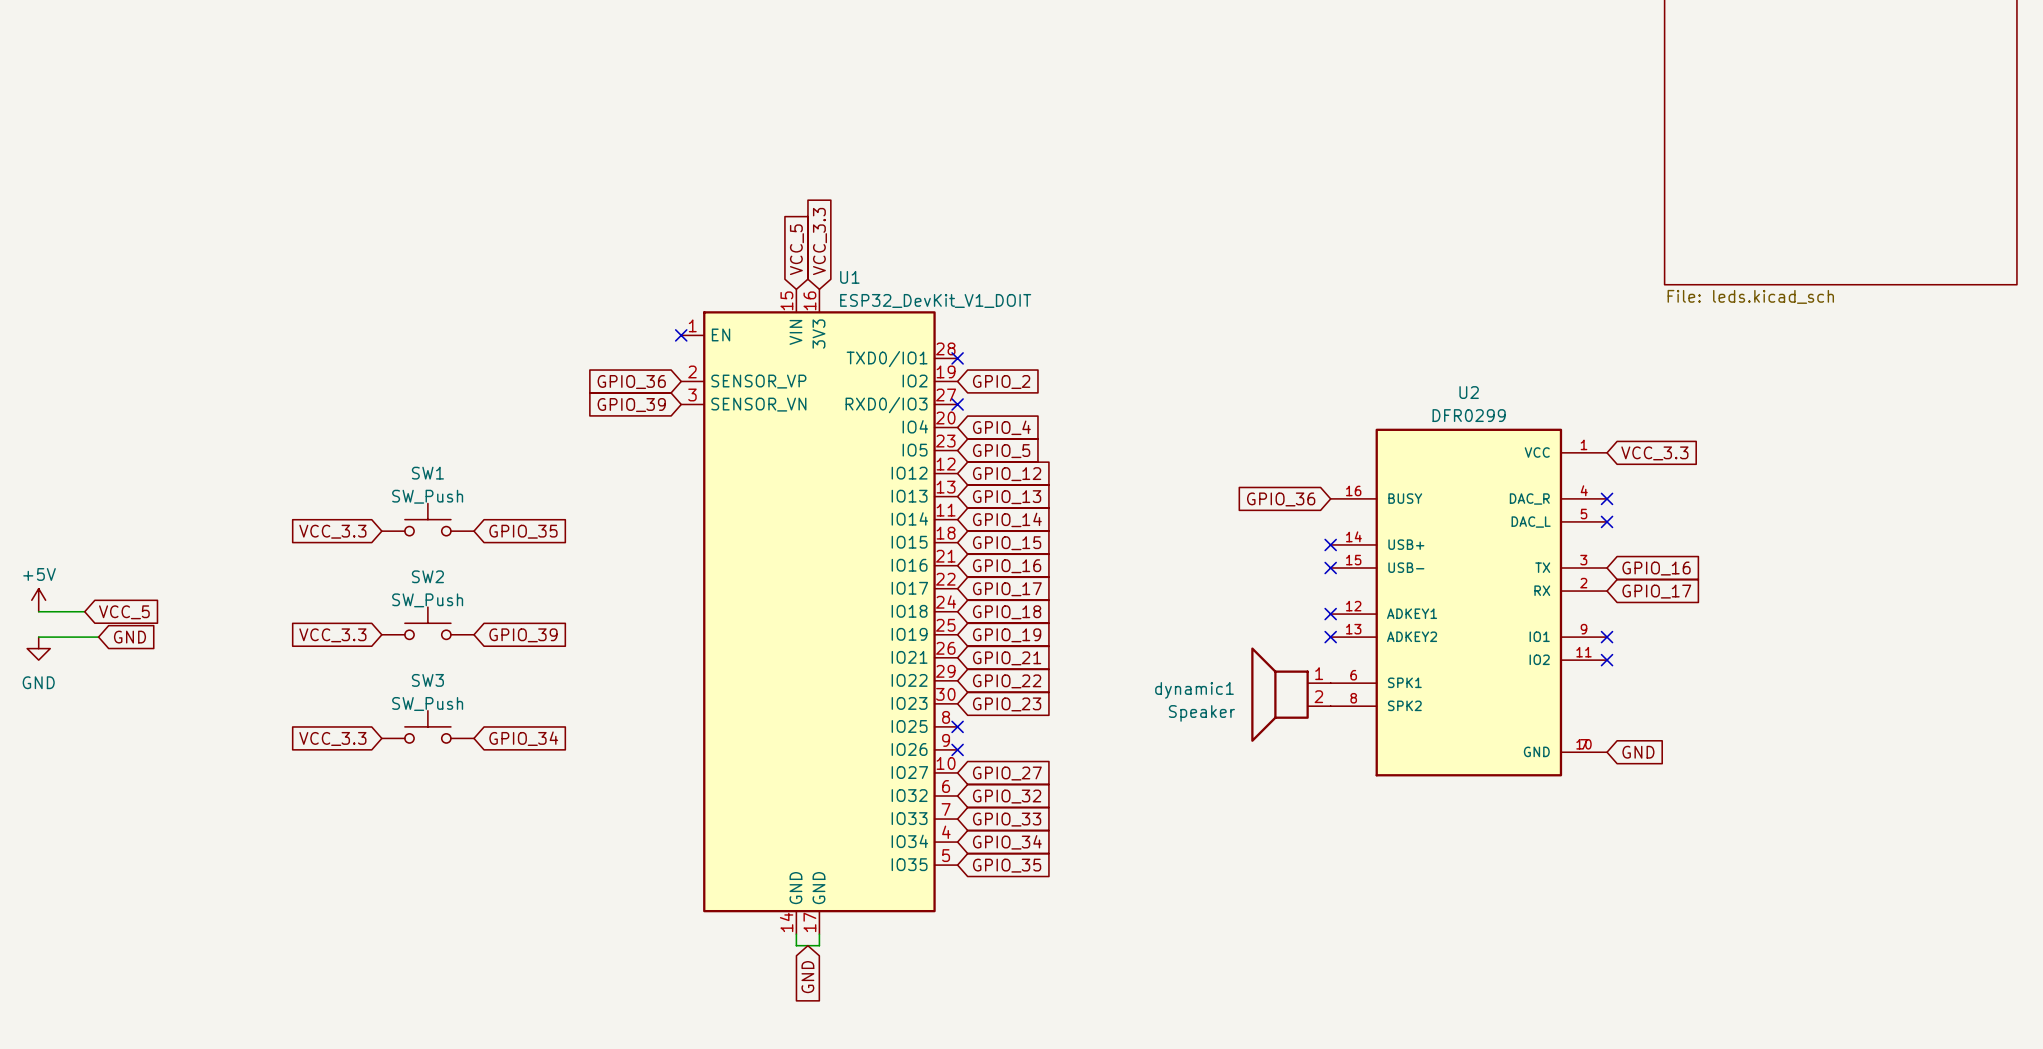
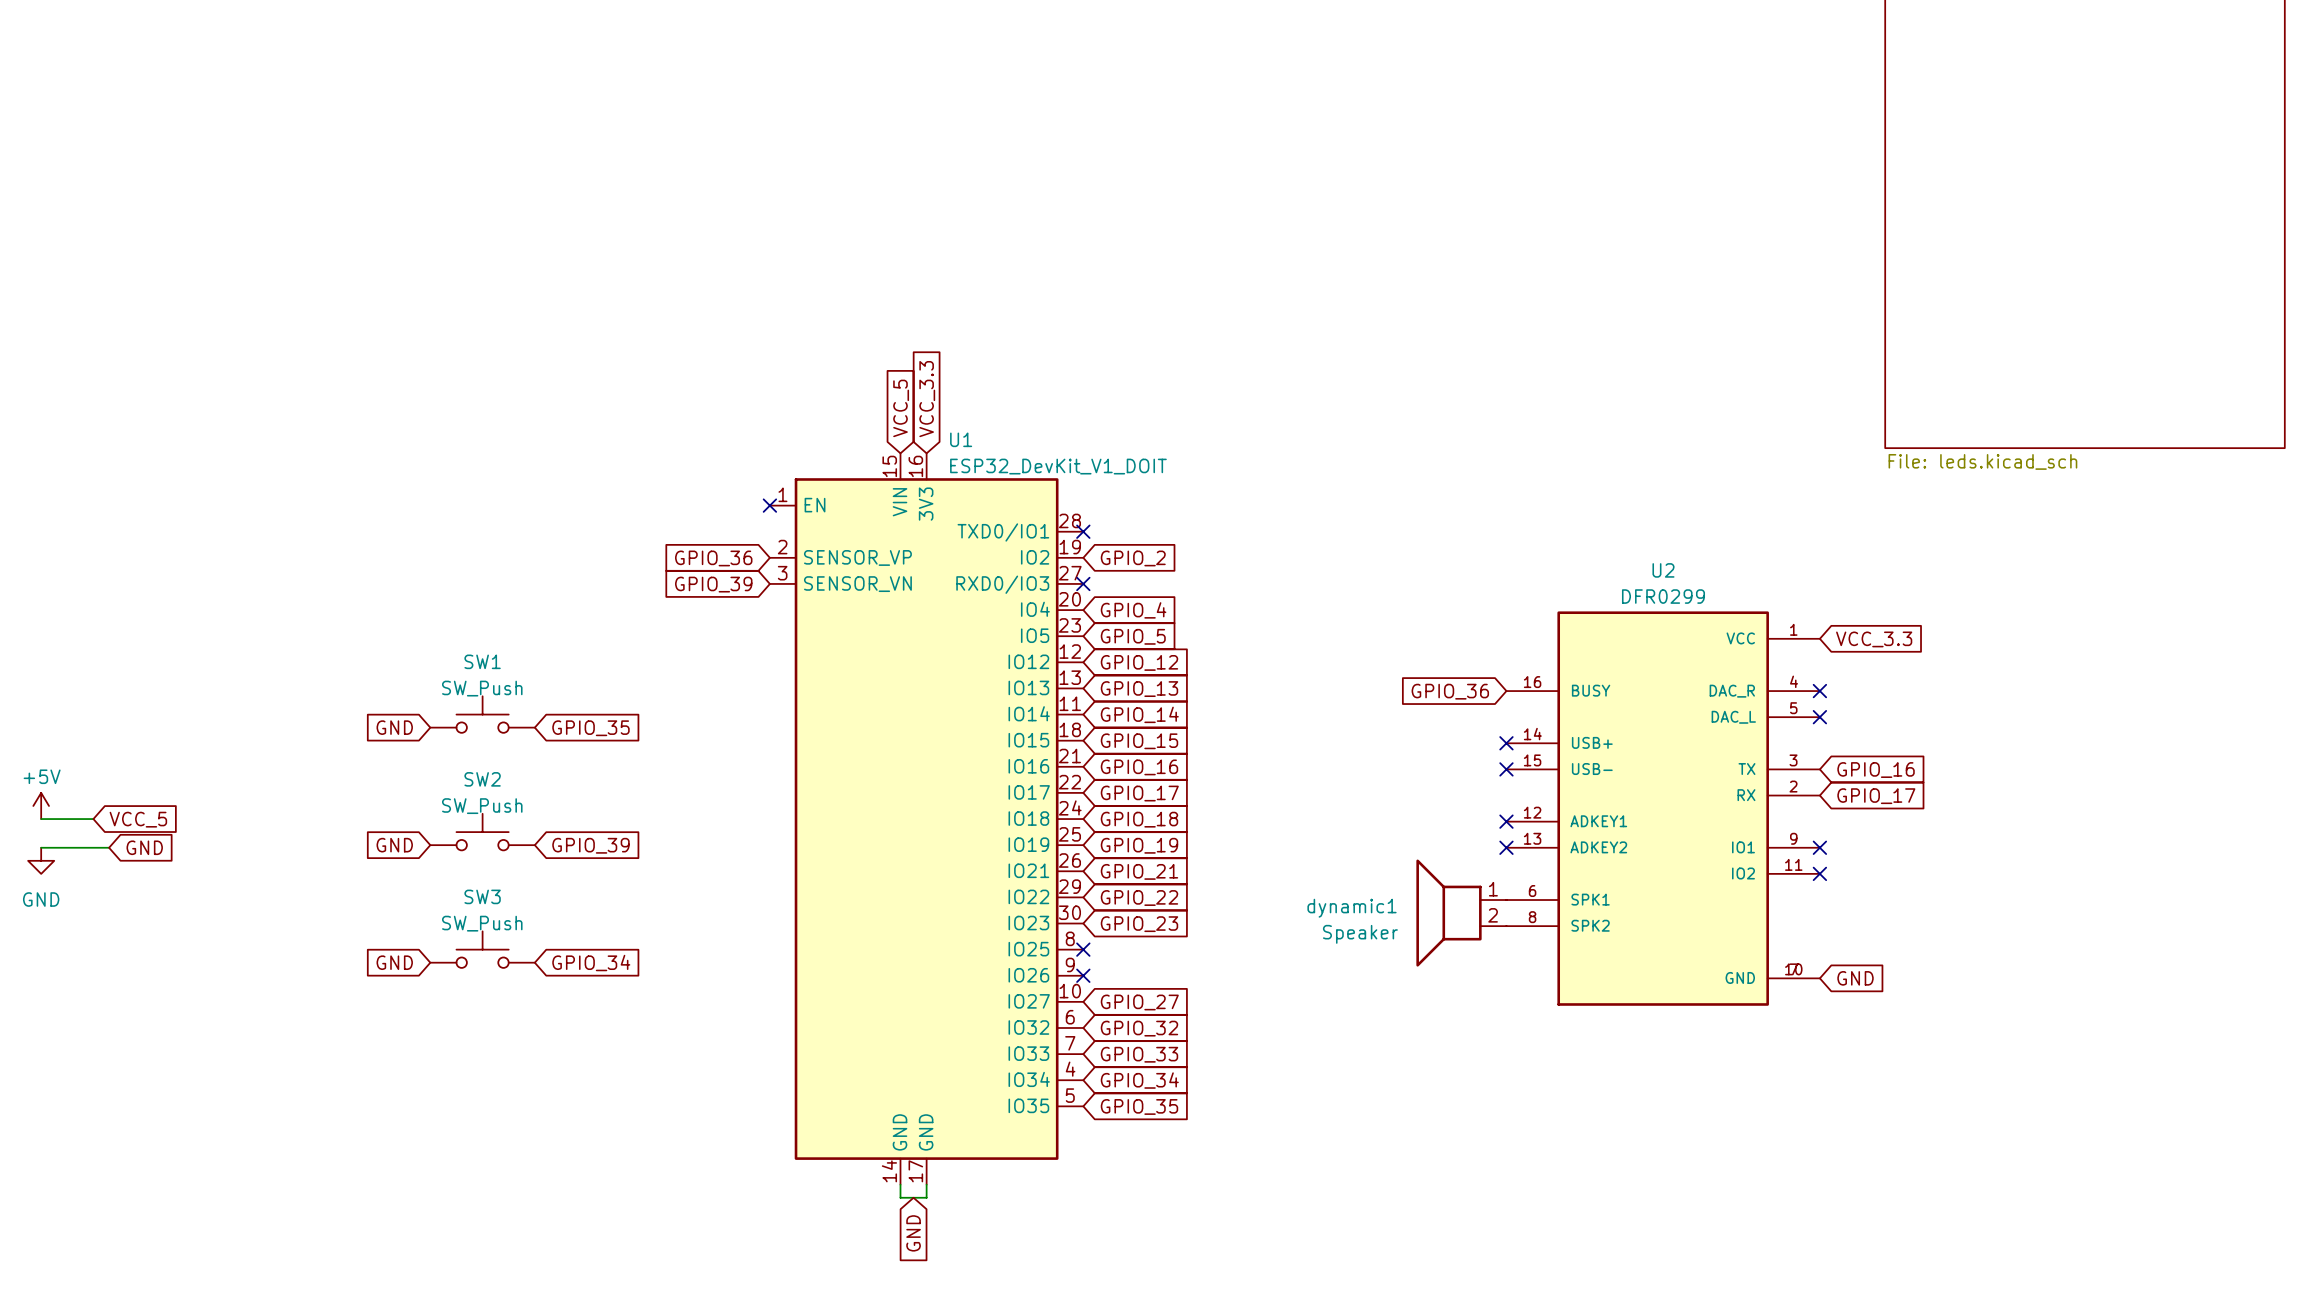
global label: VCC_3.3 (332, 531) -> GND (394, 727)
global label: VCC_3.3 (332, 635) -> GND (394, 845)
global label: VCC_3.3 (332, 738) -> GND (394, 962)

